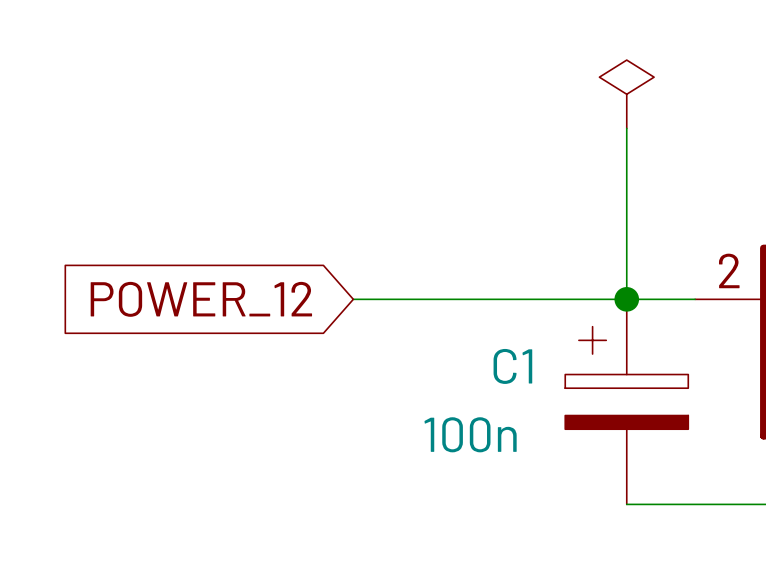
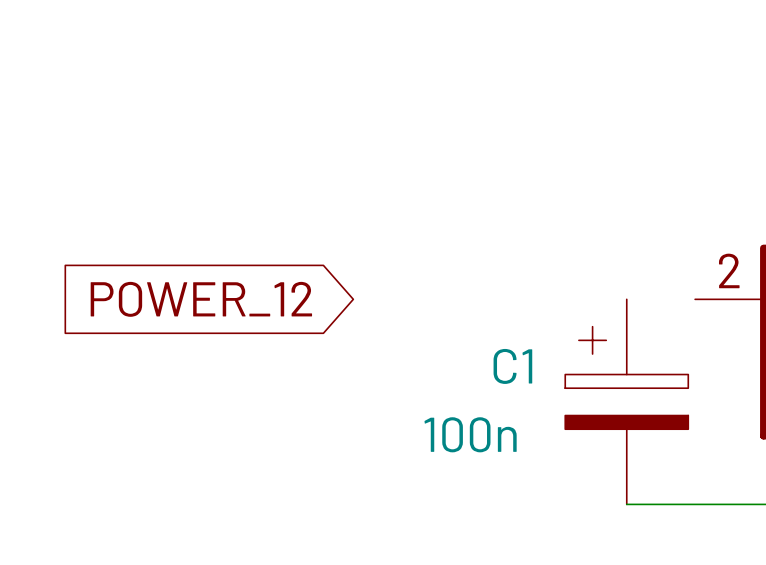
power symbol: (626, 94) -> none
wire: (626, 128) (626, 299) -> none
wire: (353, 299) (695, 299) -> none
junction: (626, 299) -> none

